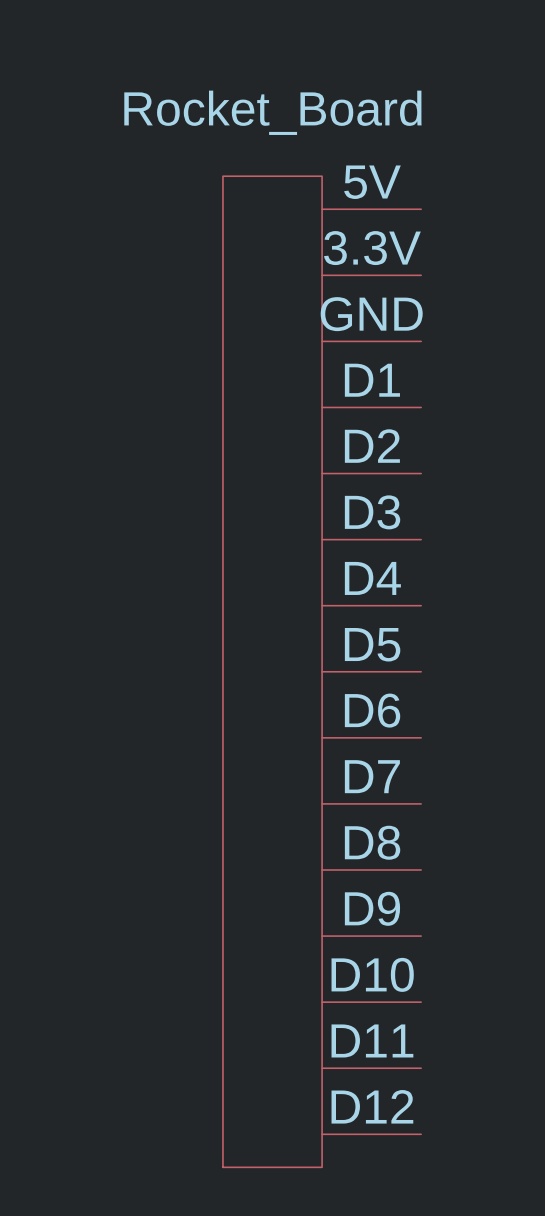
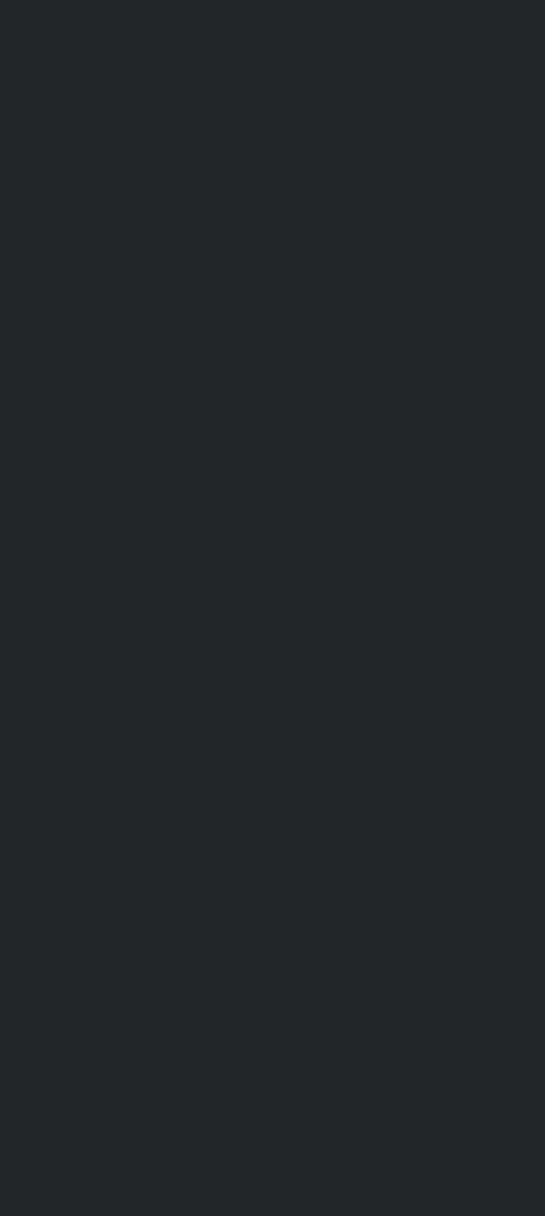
part: Rocket_Board (322, 671) -> none

